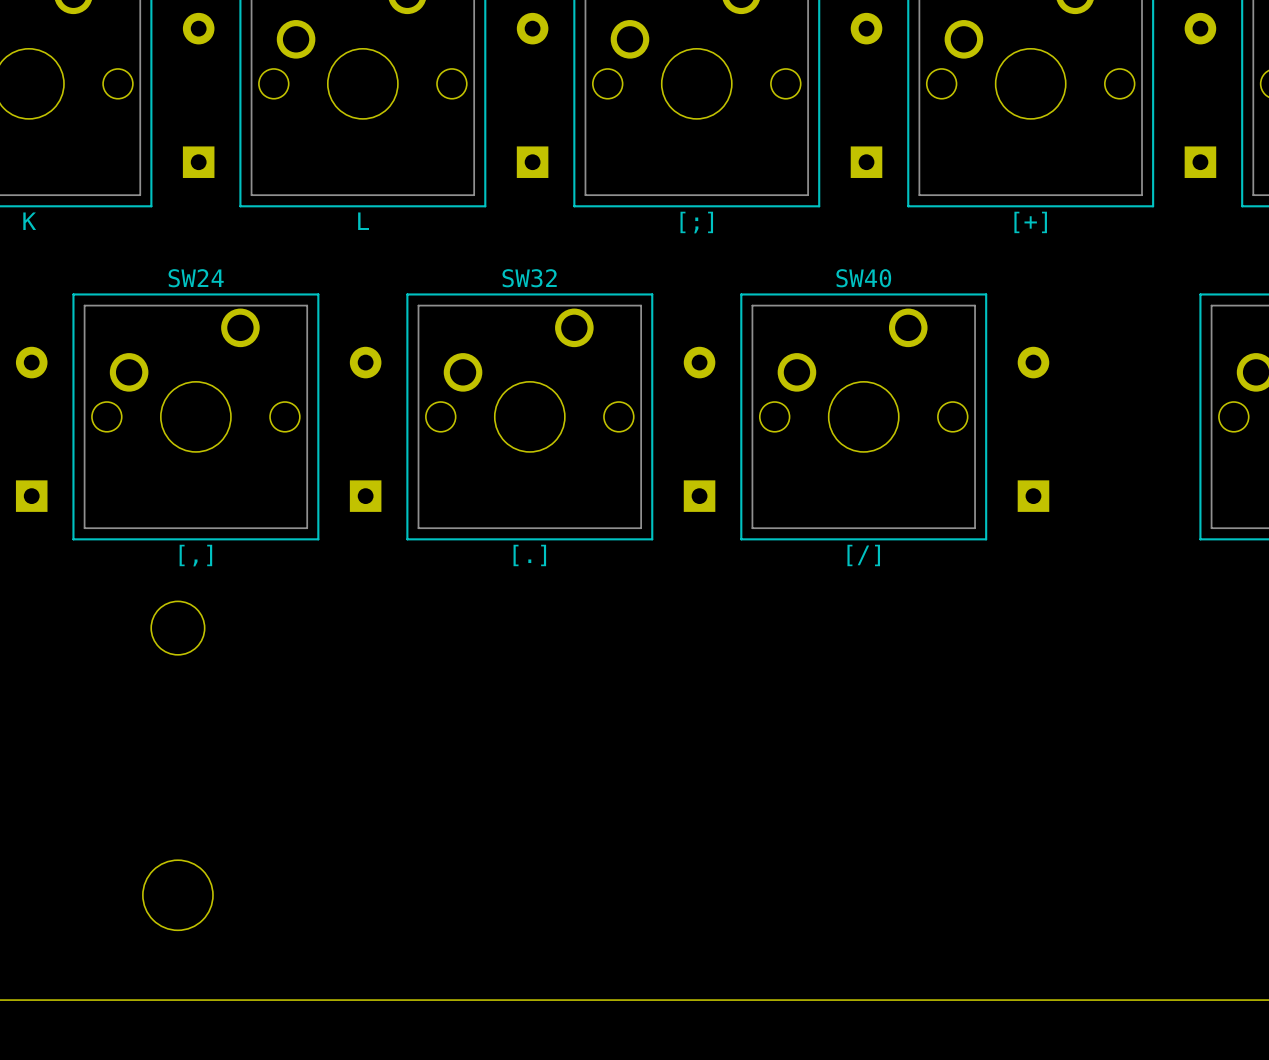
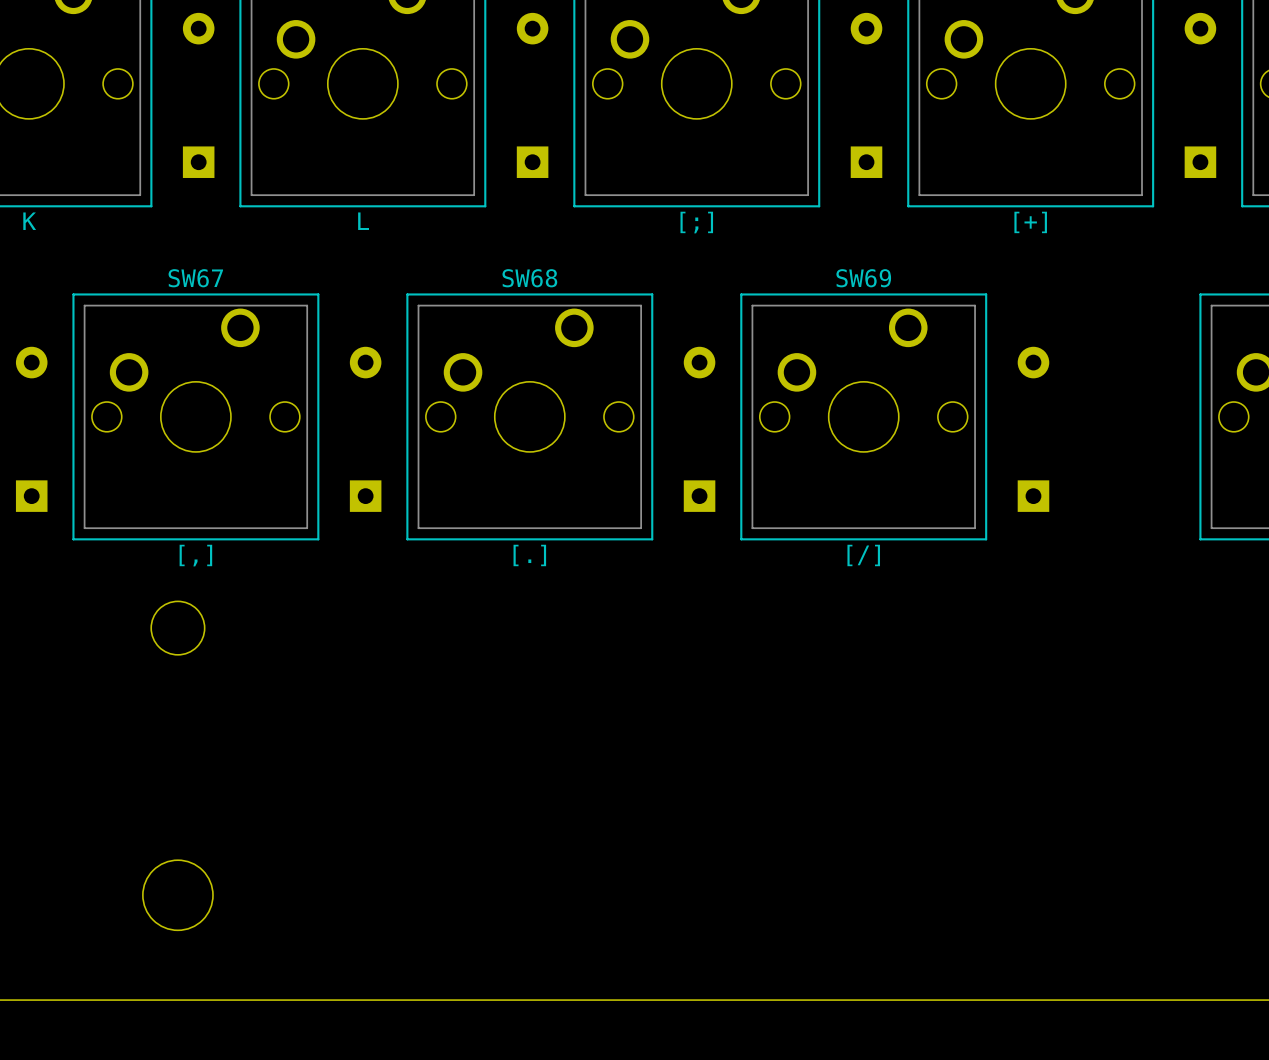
SW24 name: SW24 (196, 278) -> SW67 (195, 278)
SW32 name: SW32 (529, 278) -> SW68 (529, 278)
SW40 name: SW40 (863, 278) -> SW69 (863, 278)

